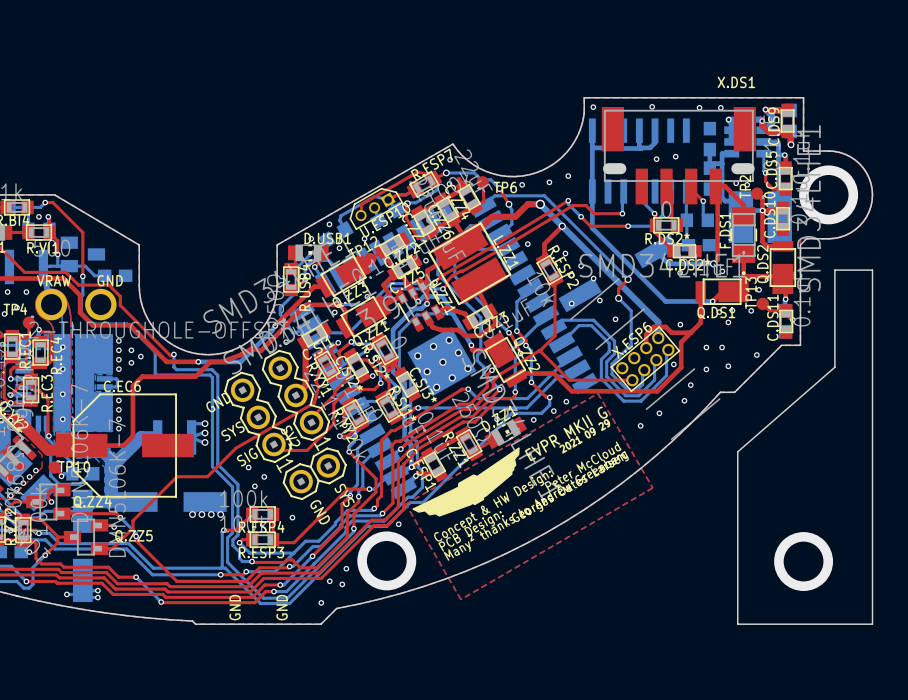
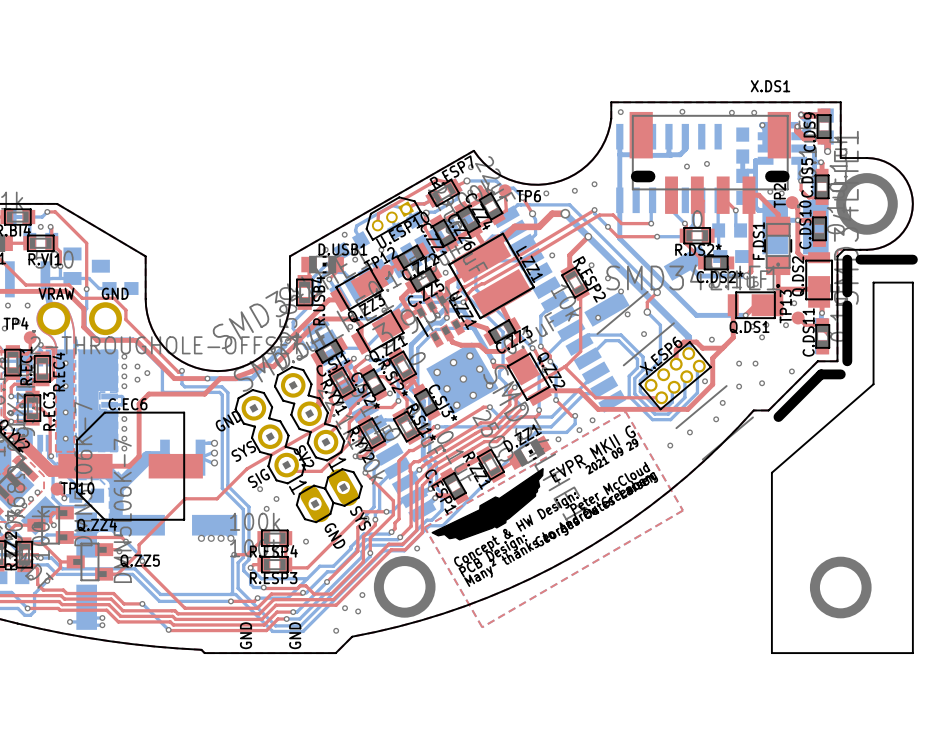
board edge: none -> (847, 259) (847, 292)
board edge: none -> (860, 259) (912, 259)
board edge: none -> (847, 305) (847, 361)
board edge: none -> (840, 374) (821, 374) (778, 417)
part footprint: [282, 447, 347, 501] -> [295, 468, 363, 524]

